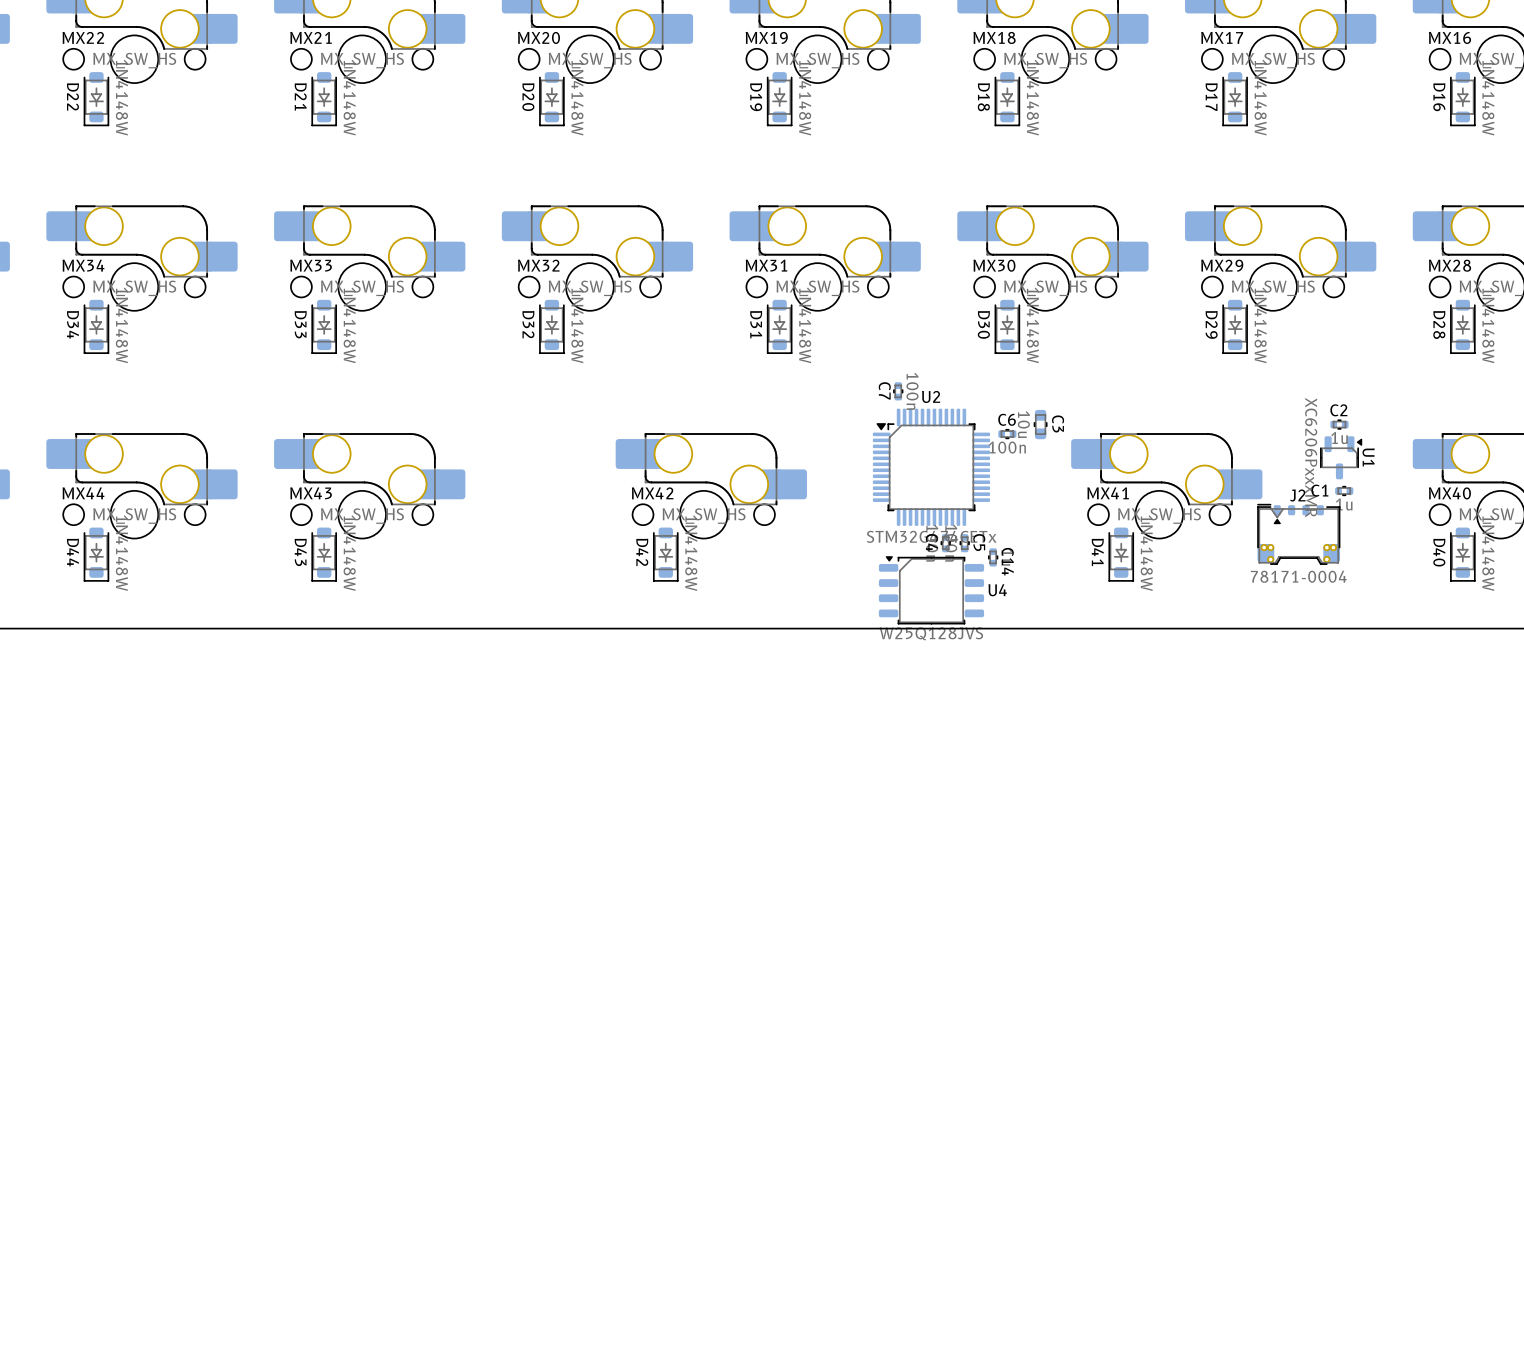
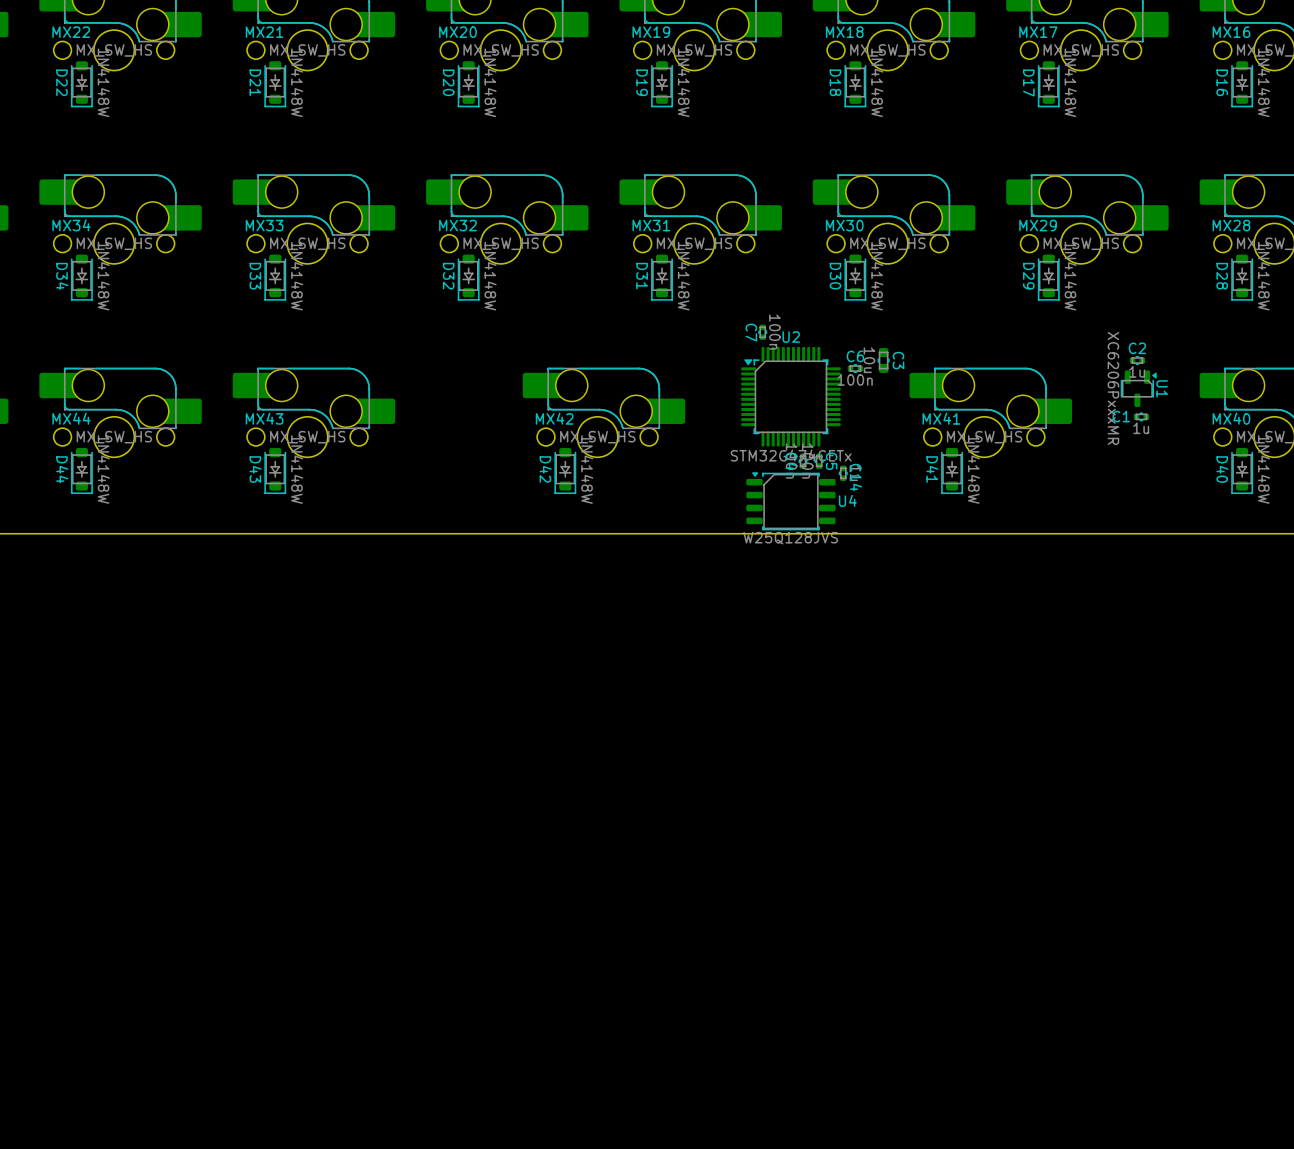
J2: 78171-0004 (1298, 534) -> none

